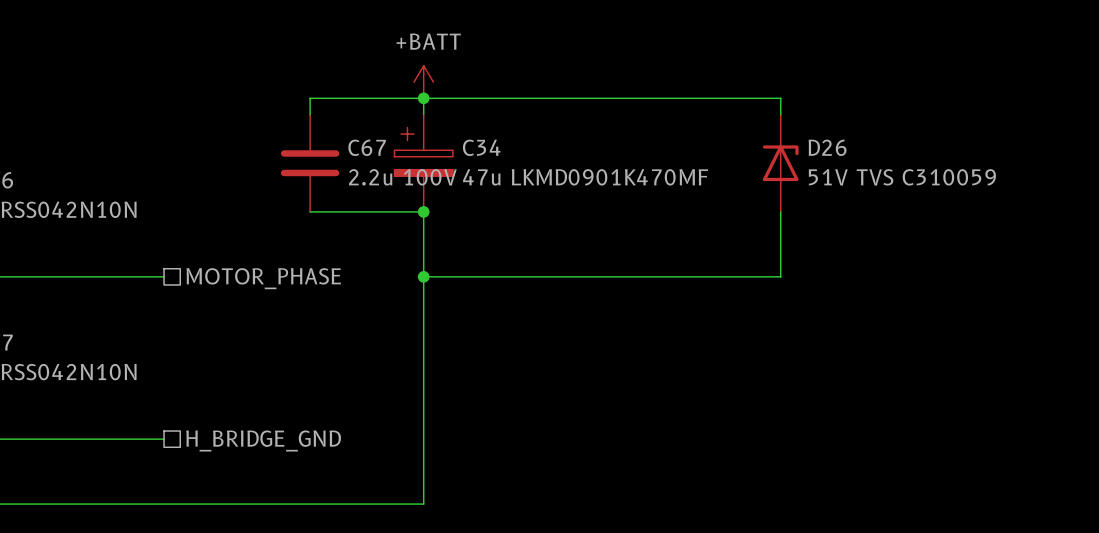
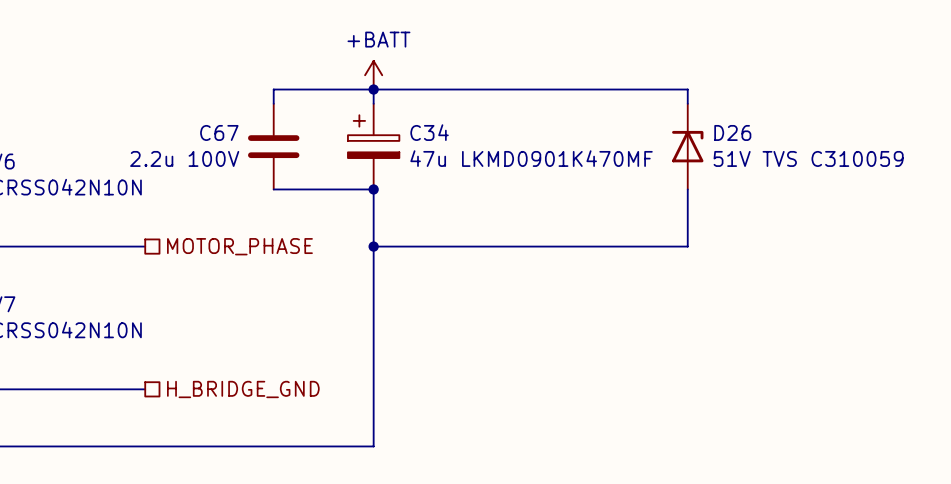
C67 name position: C67 (367, 147) -> C67 (219, 132)
C67 value position: 2.2u 100V (402, 177) -> 2.2u 100V (184, 158)

